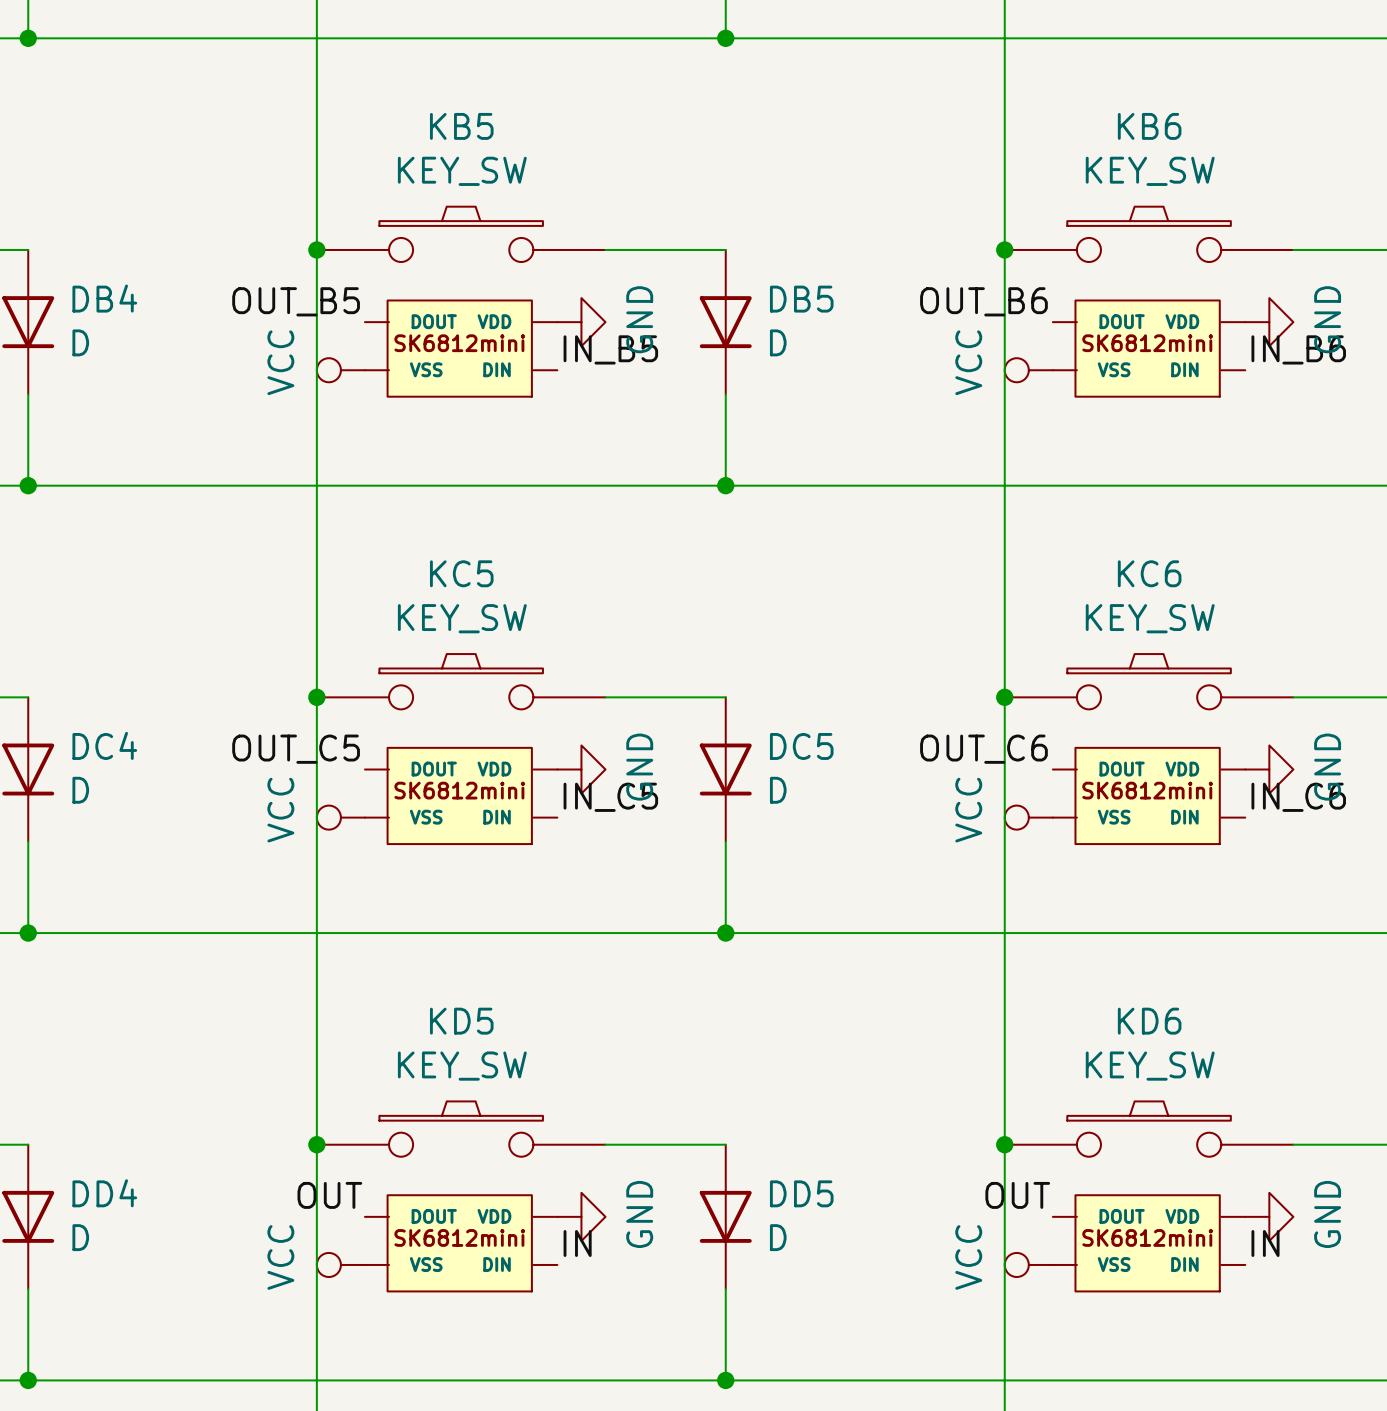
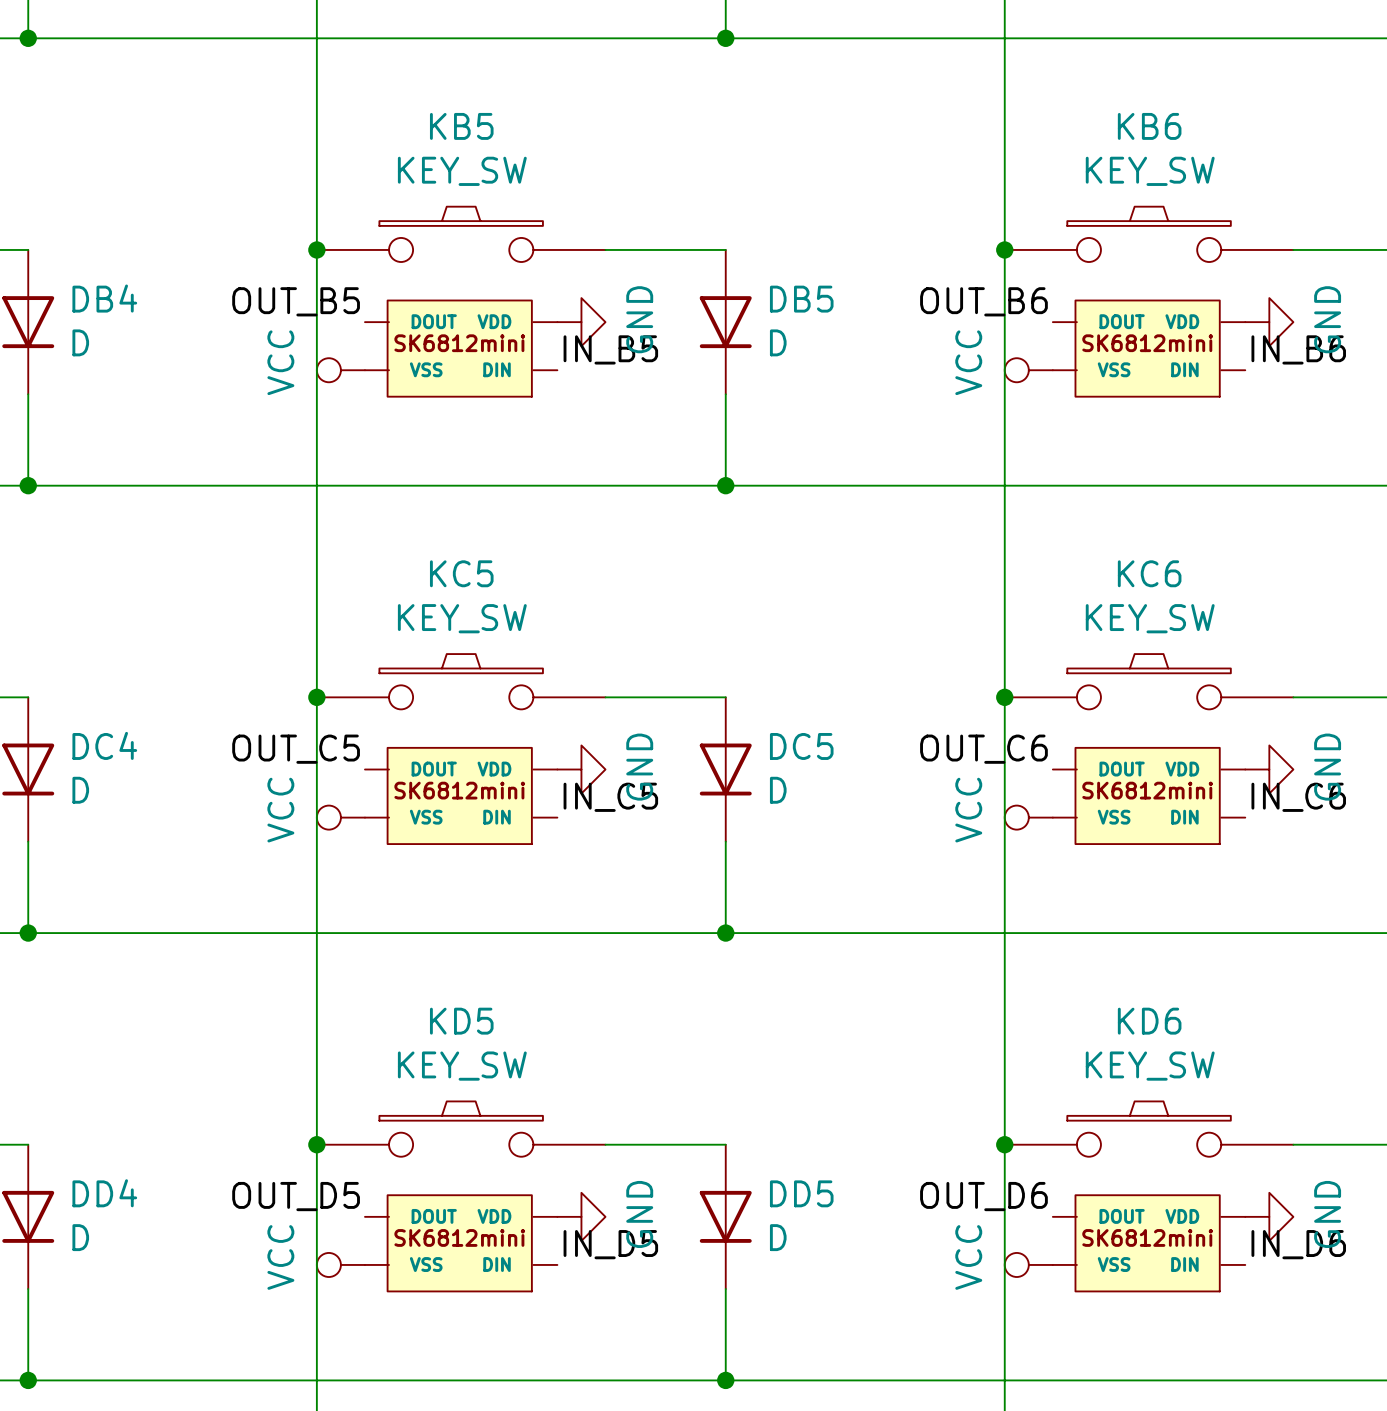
label: OUT (329, 1195) -> OUT_D5 (296, 1196)
label: OUT (1017, 1195) -> OUT_D6 (983, 1196)
label: IN (577, 1243) -> IN_D5 (610, 1244)
label: IN (1265, 1243) -> IN_D6 (1298, 1244)

